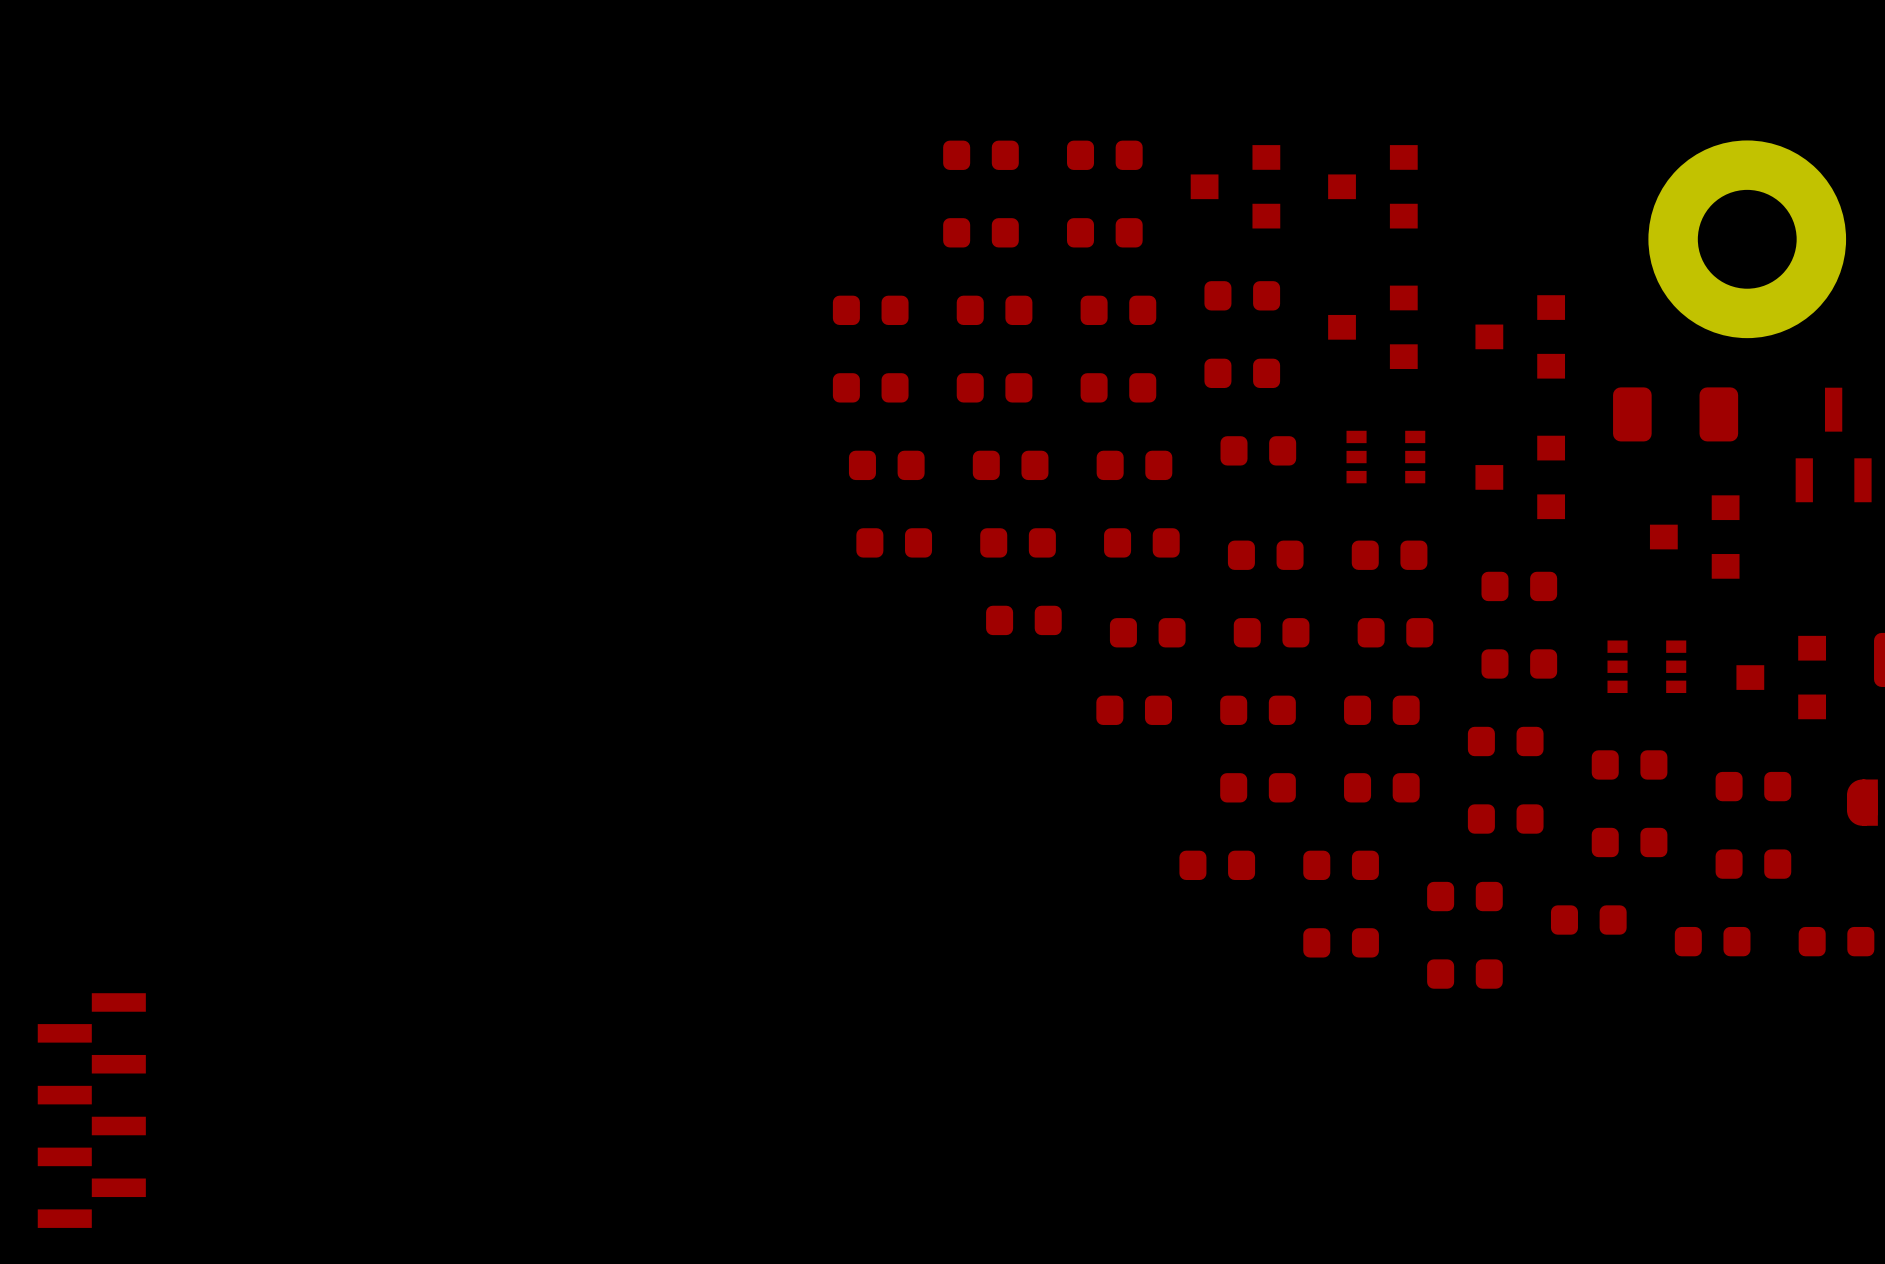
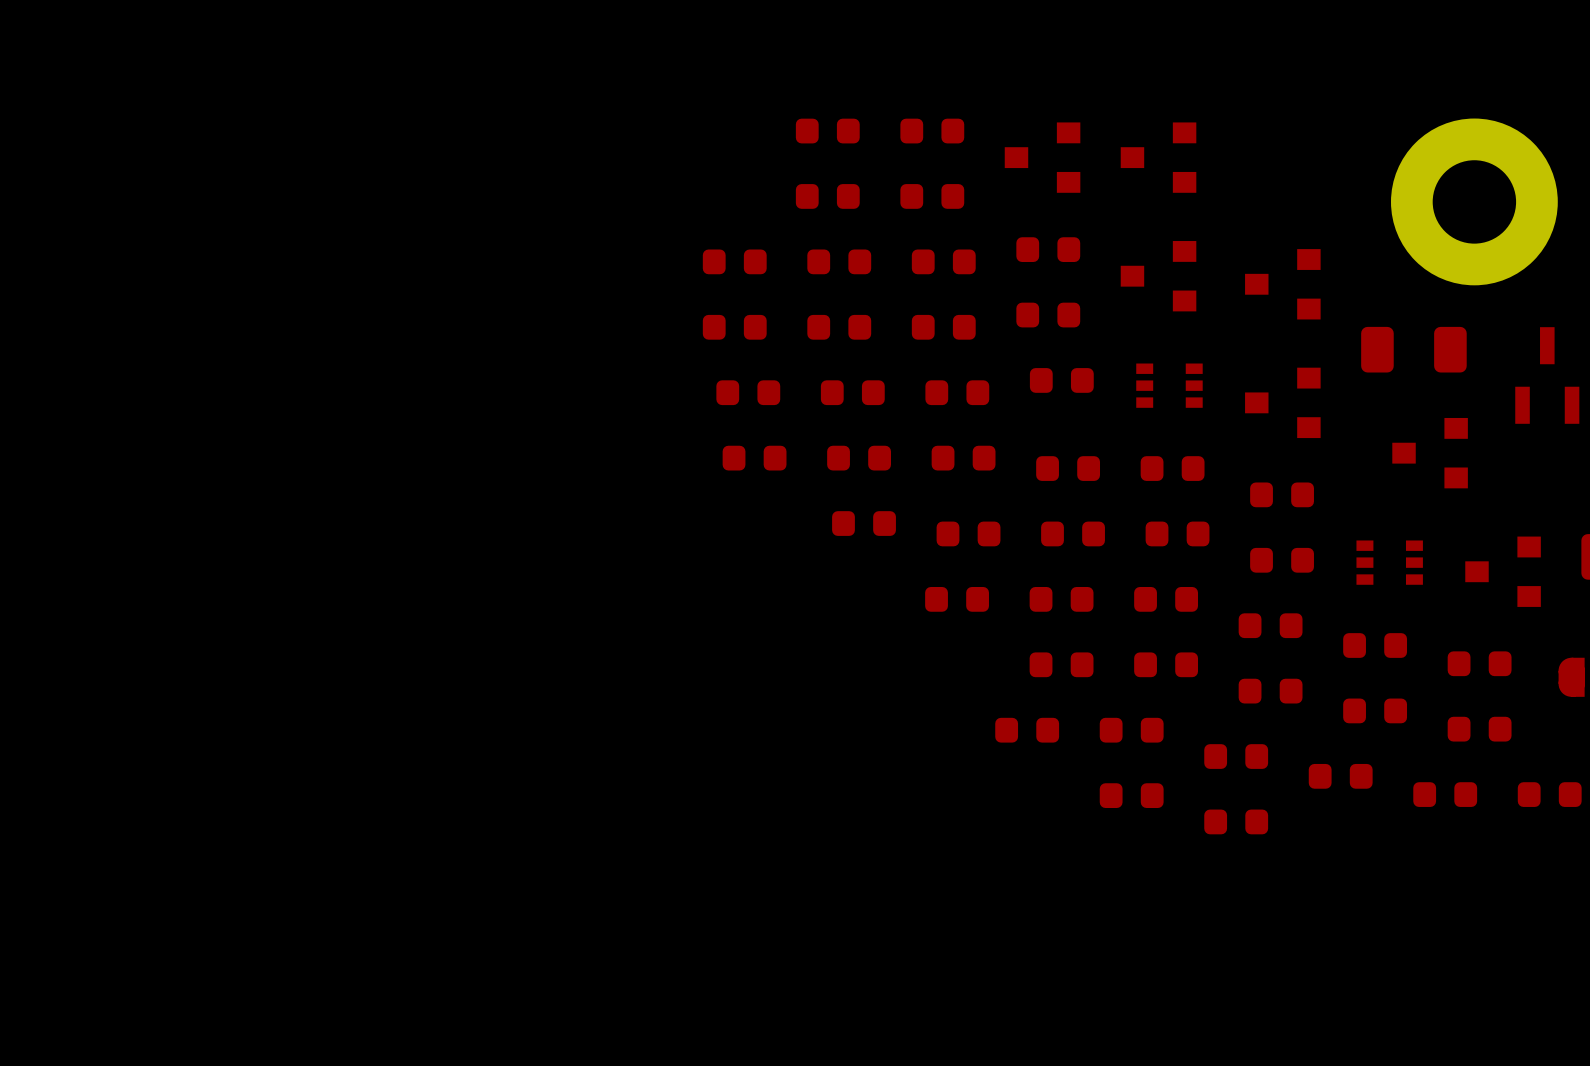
part: (91, 1110) -> none

